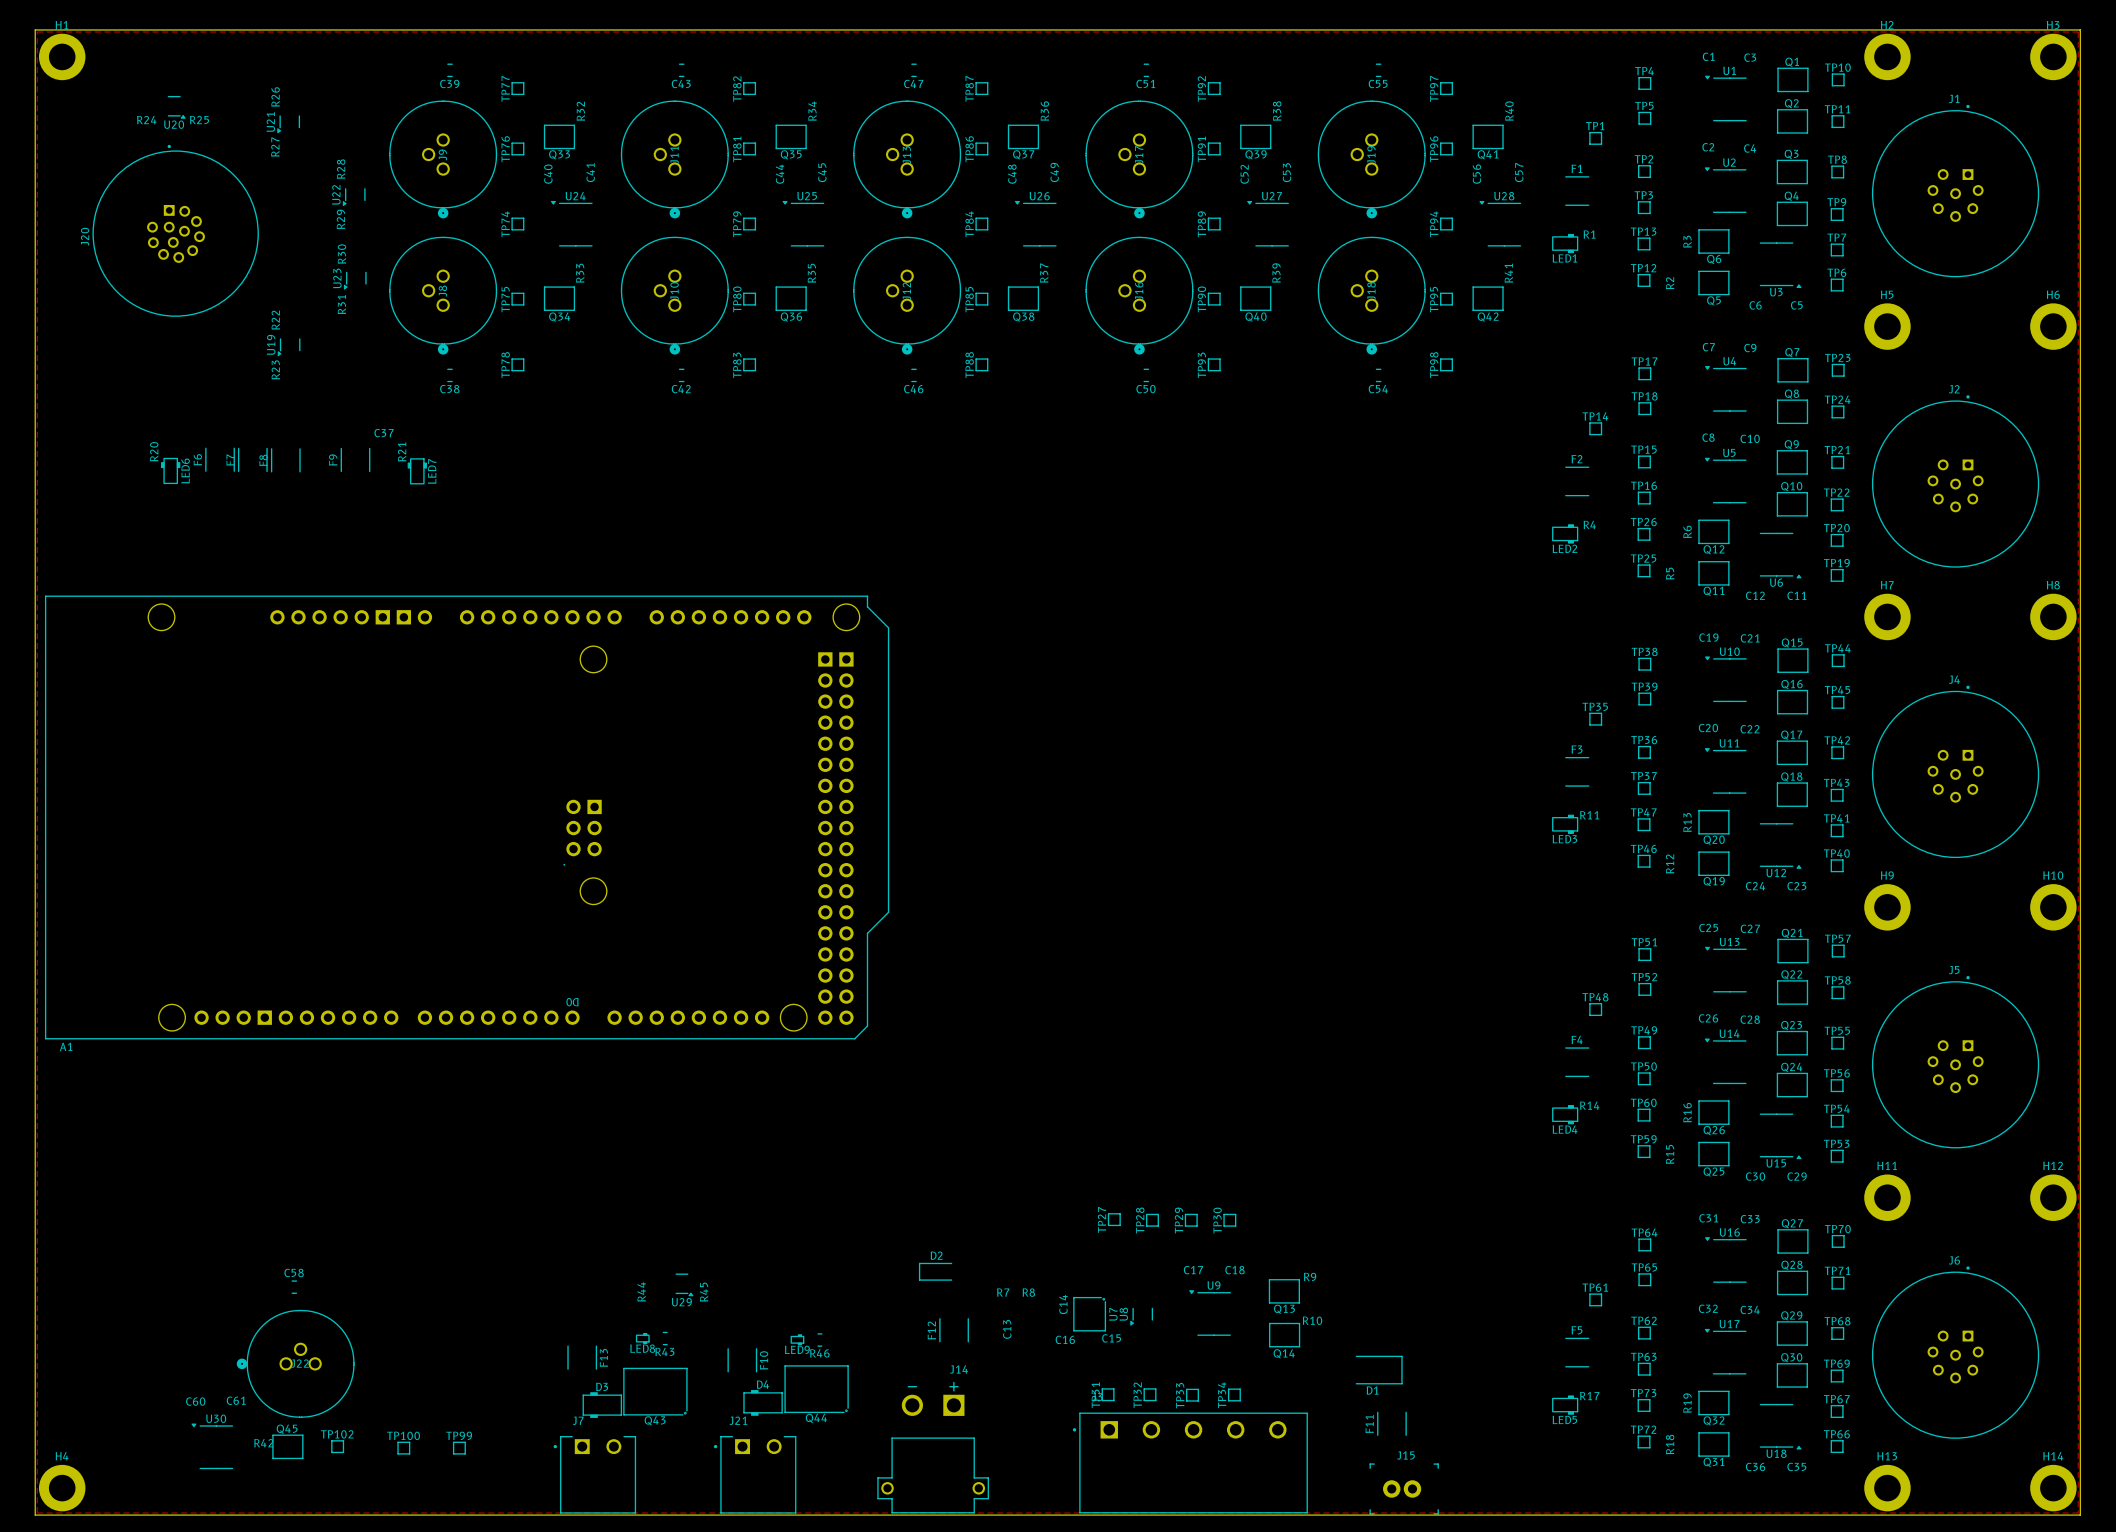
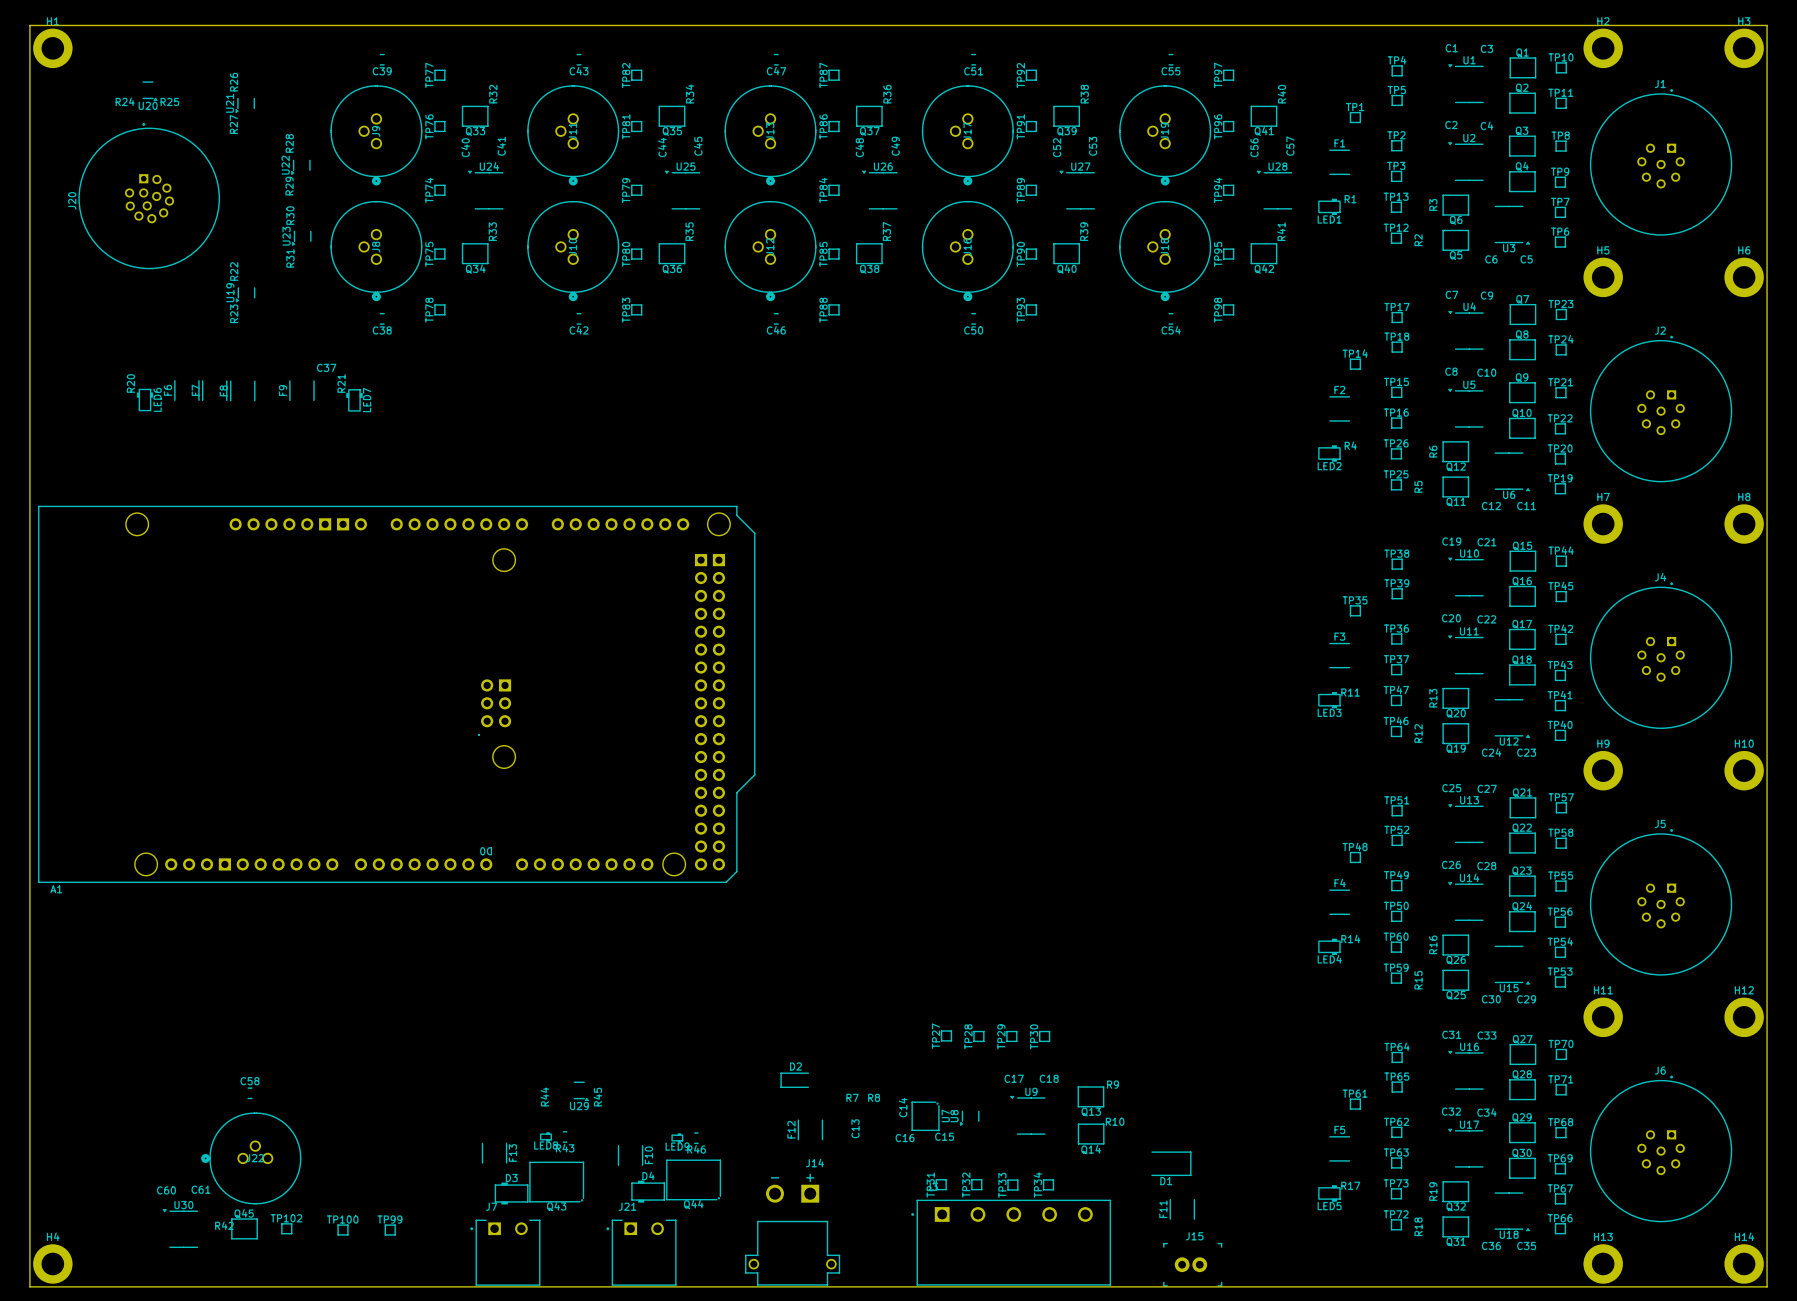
zone outline: (37, 32) (2078, 32) (2078, 1512) (37, 1512) (37, 32) -> none

